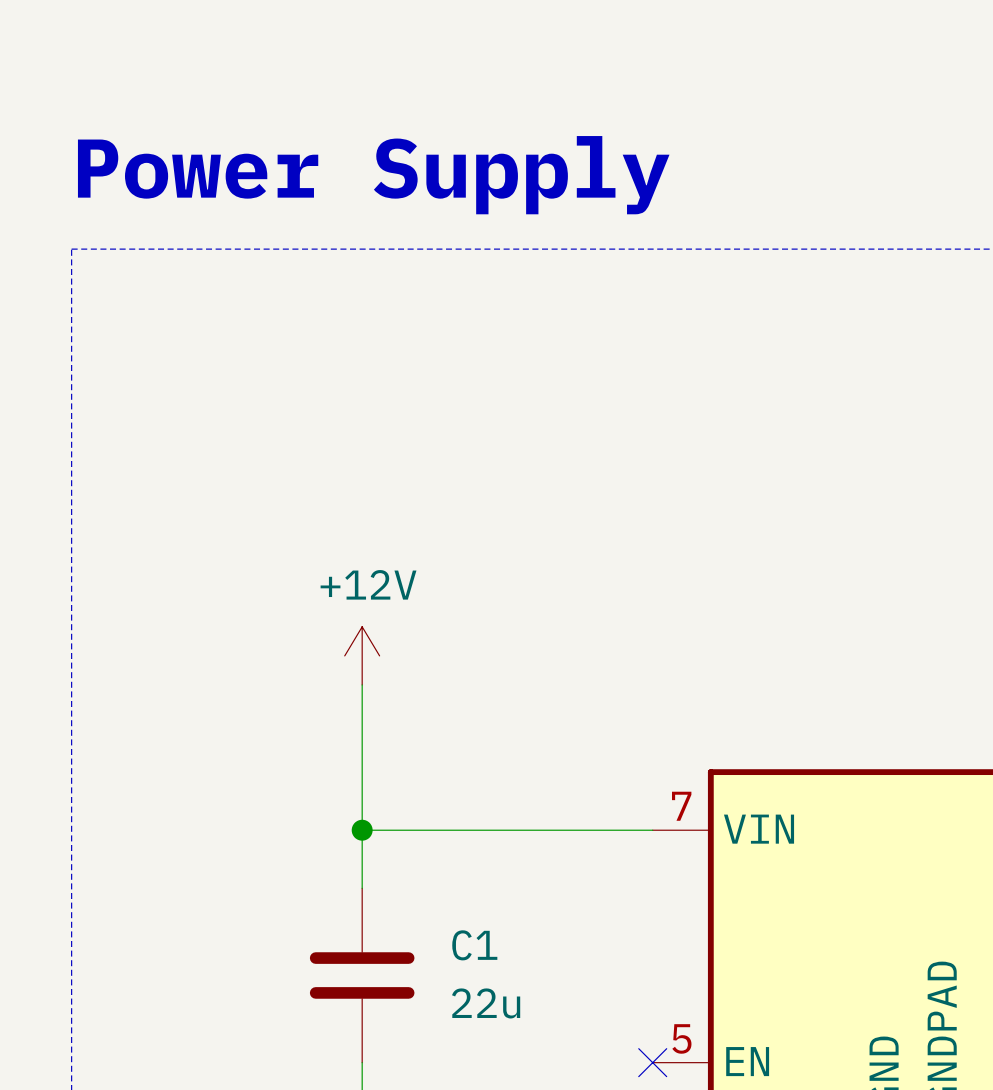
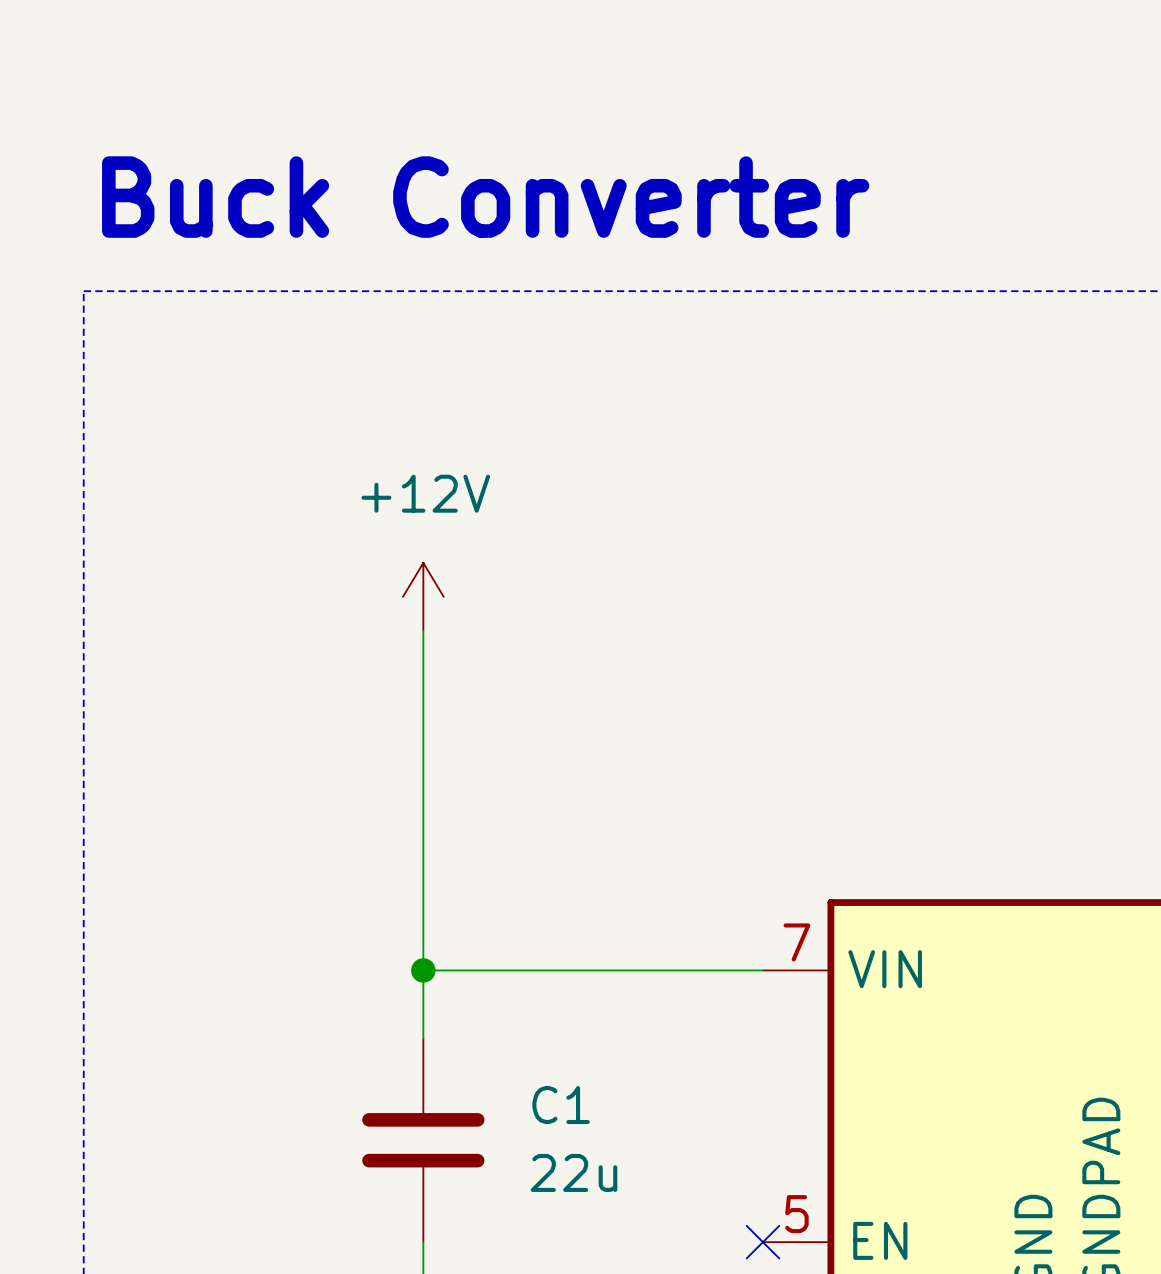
text: Power Supply (373, 175) -> Buck Converter (485, 197)
wire: none -> (423, 630) (423, 800)
power symbol text position: +12V (368, 584) -> +12V (425, 493)
power symbol position: +12V (362, 655) -> +12V (423, 596)

